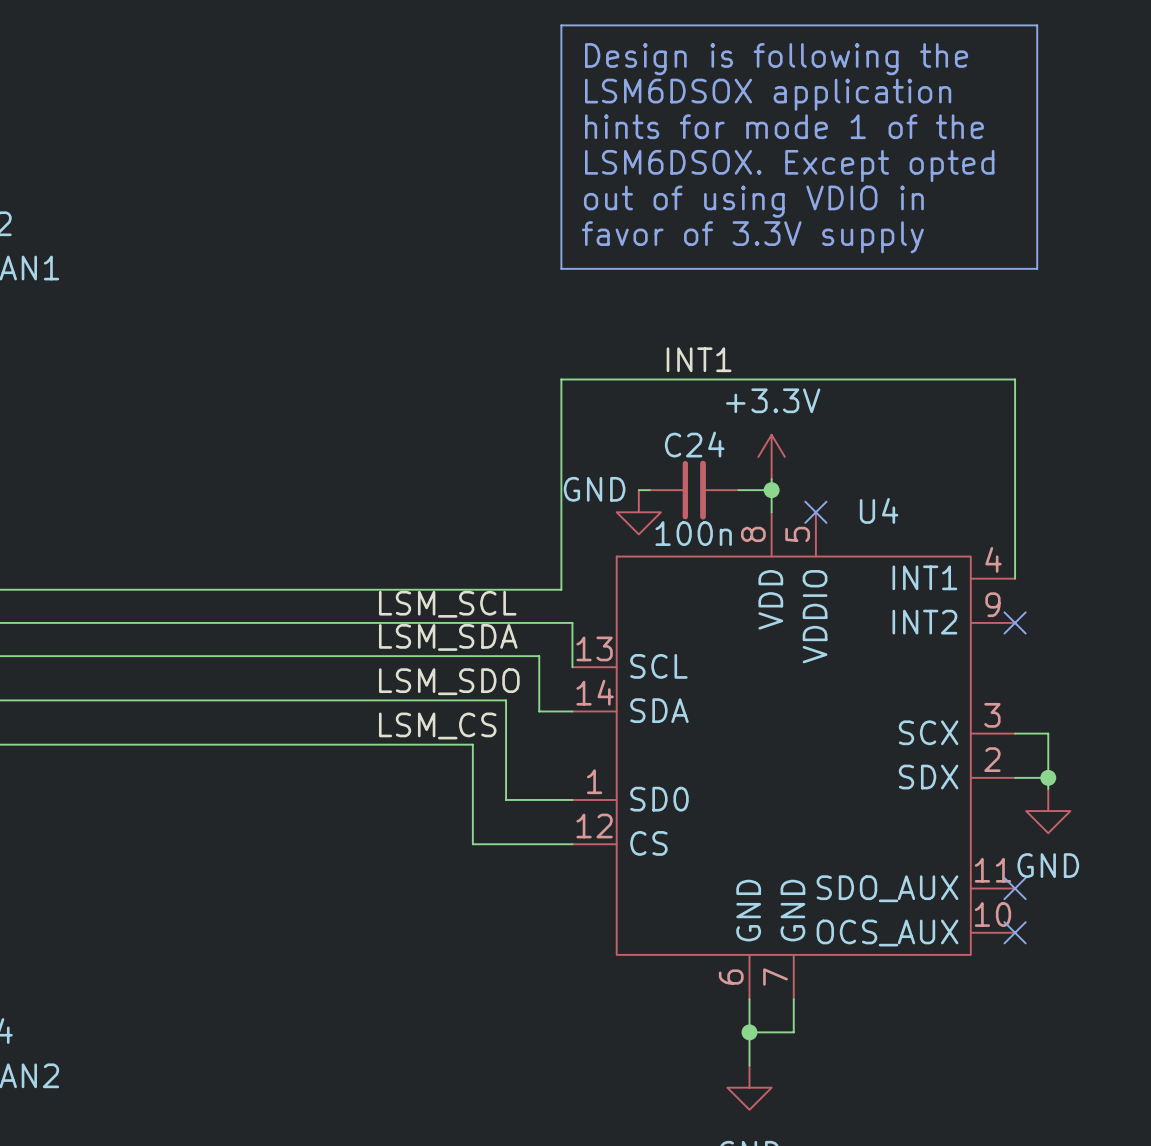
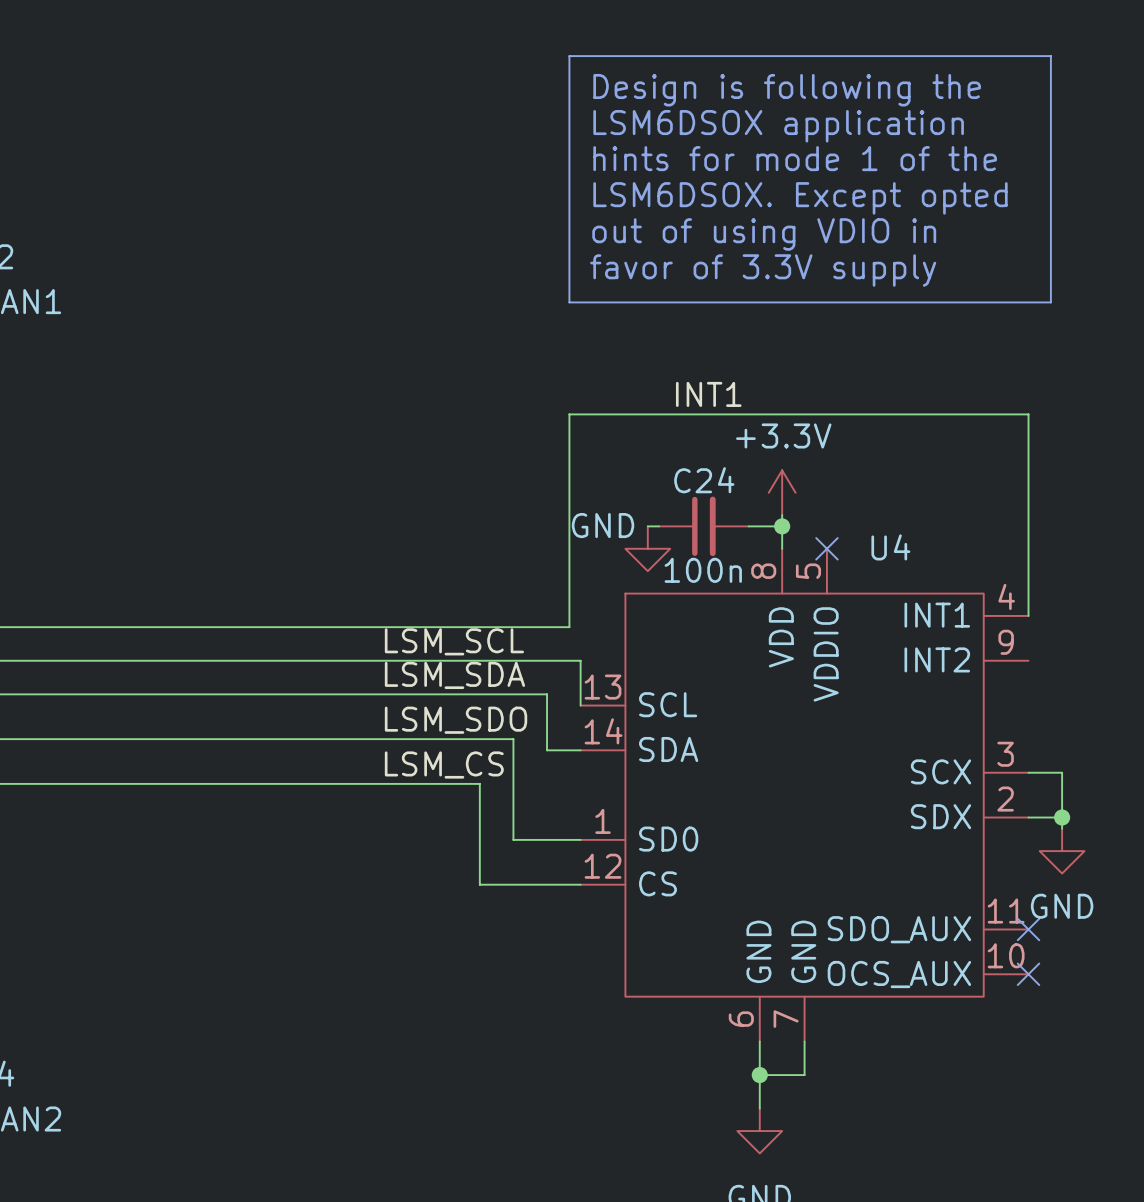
no-connect mark: (1015, 622) -> none

